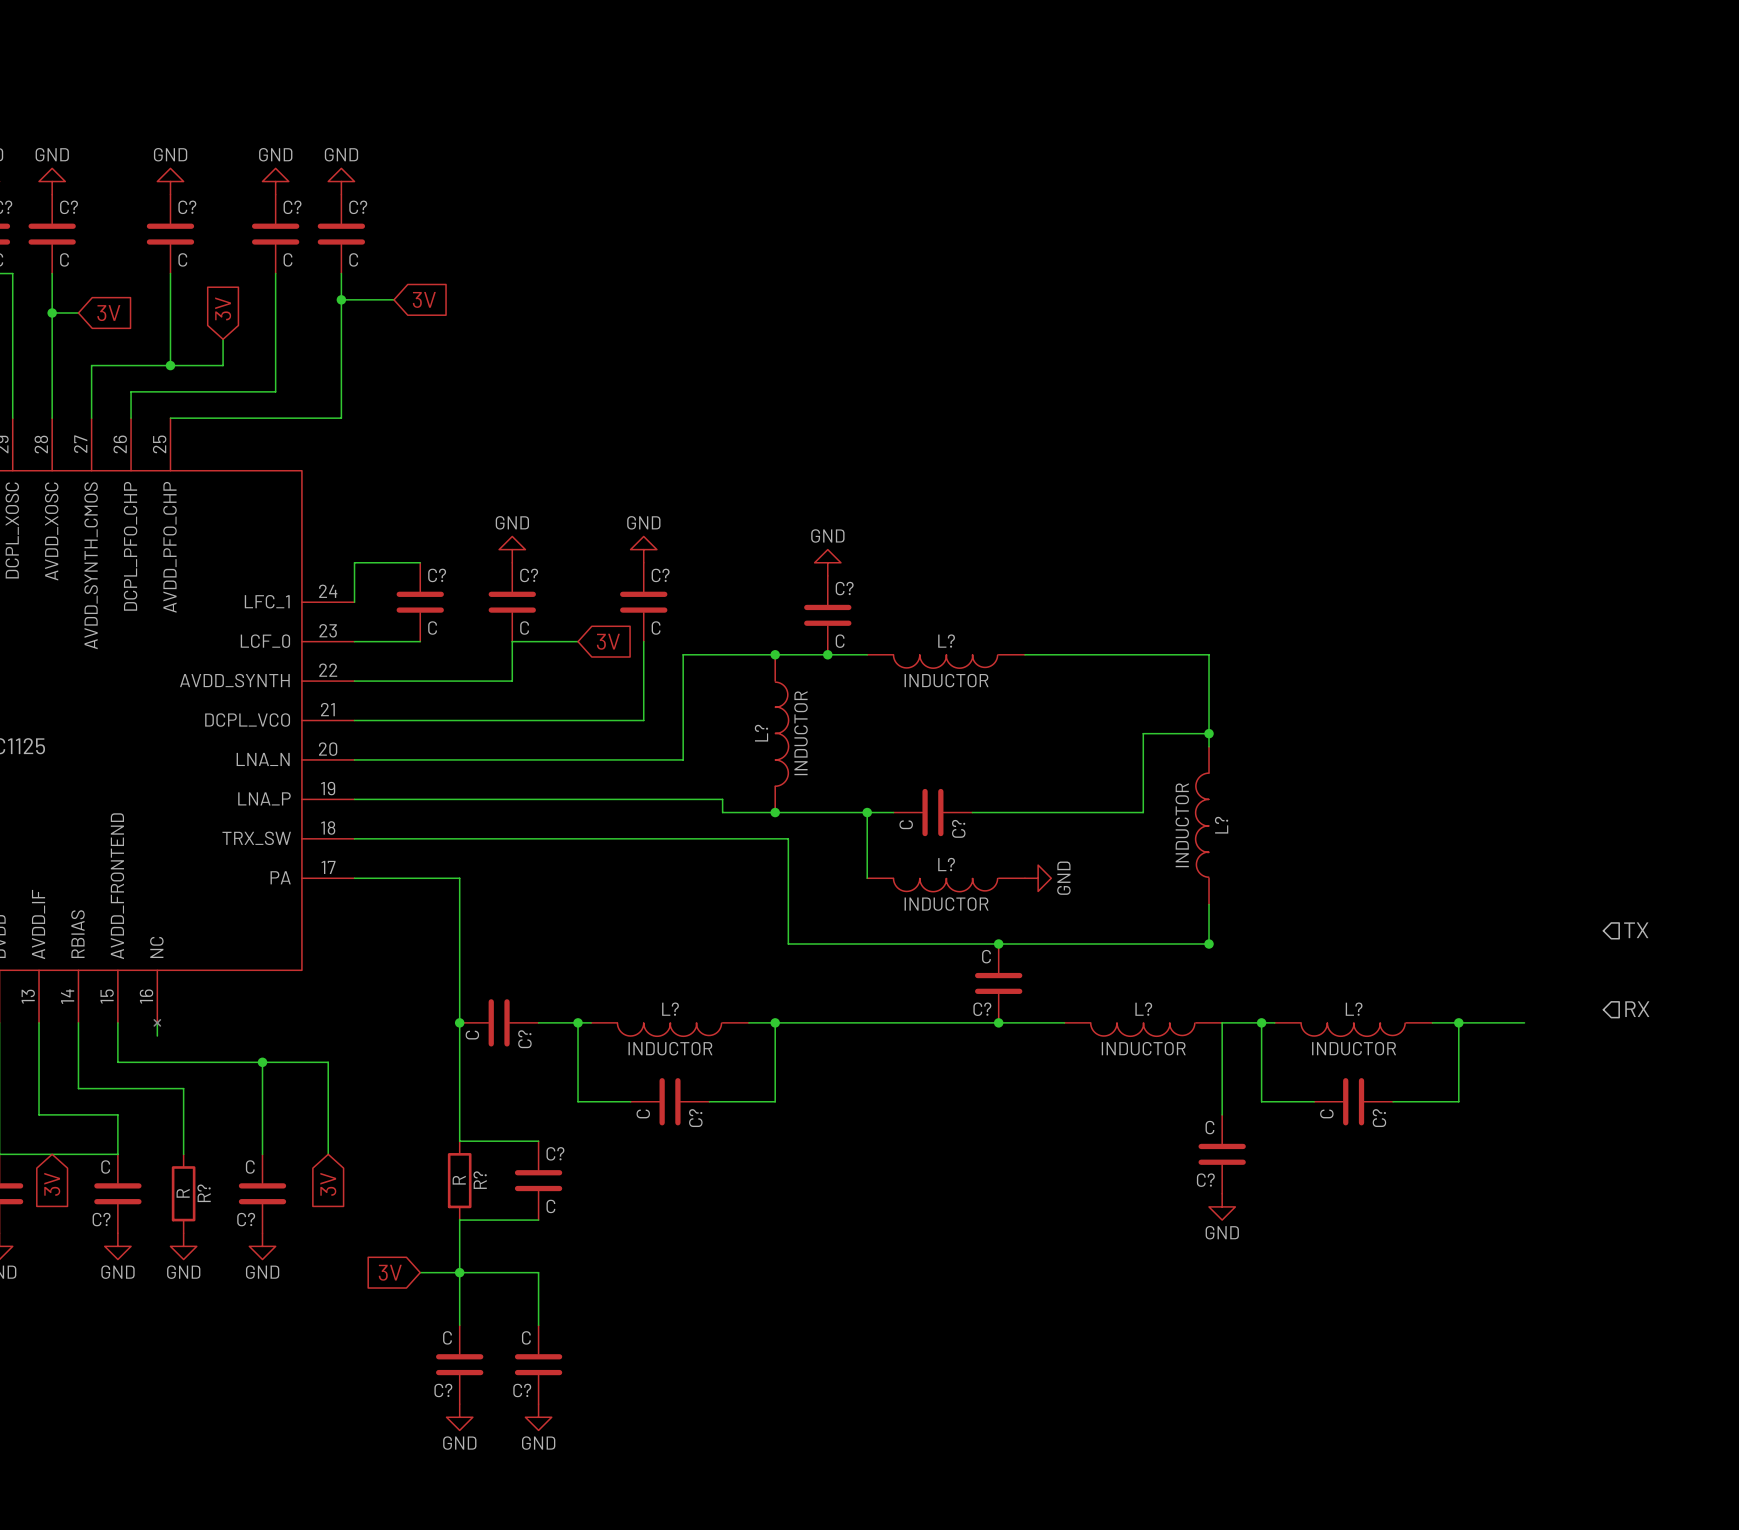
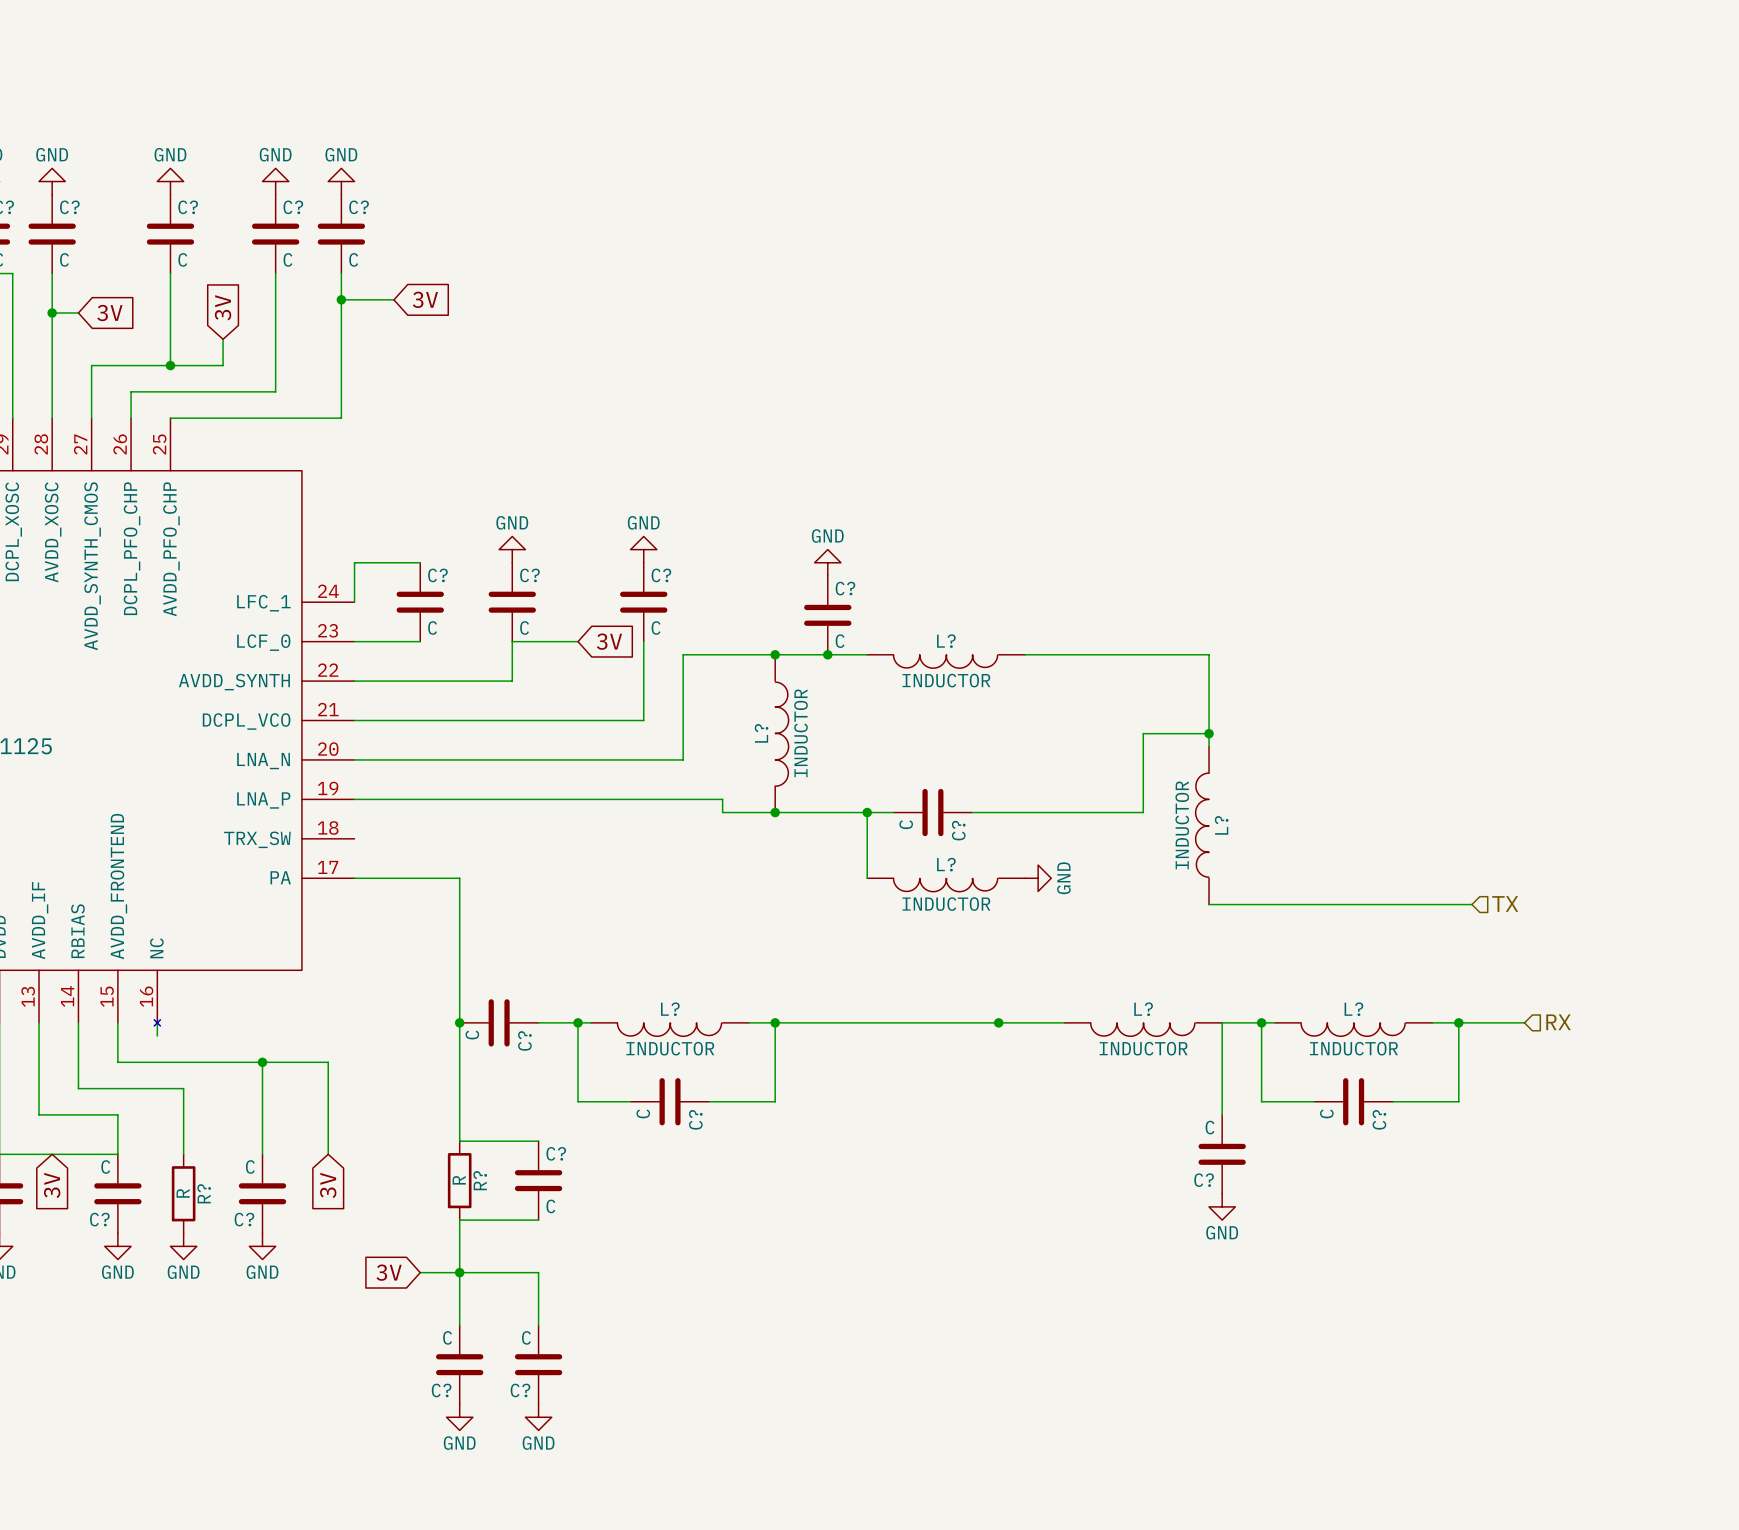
wire: (354, 838) (788, 838) (788, 944) (1209, 944) (1209, 904) -> (1471, 904) (1209, 904)
hierarchical label position: TX (1636, 930) -> TX (1505, 903)
junction: (998, 944) -> none
junction: (1209, 944) -> none
C?: C (998, 983) -> none
hierarchical label position: RX (1637, 1009) -> RX (1558, 1022)

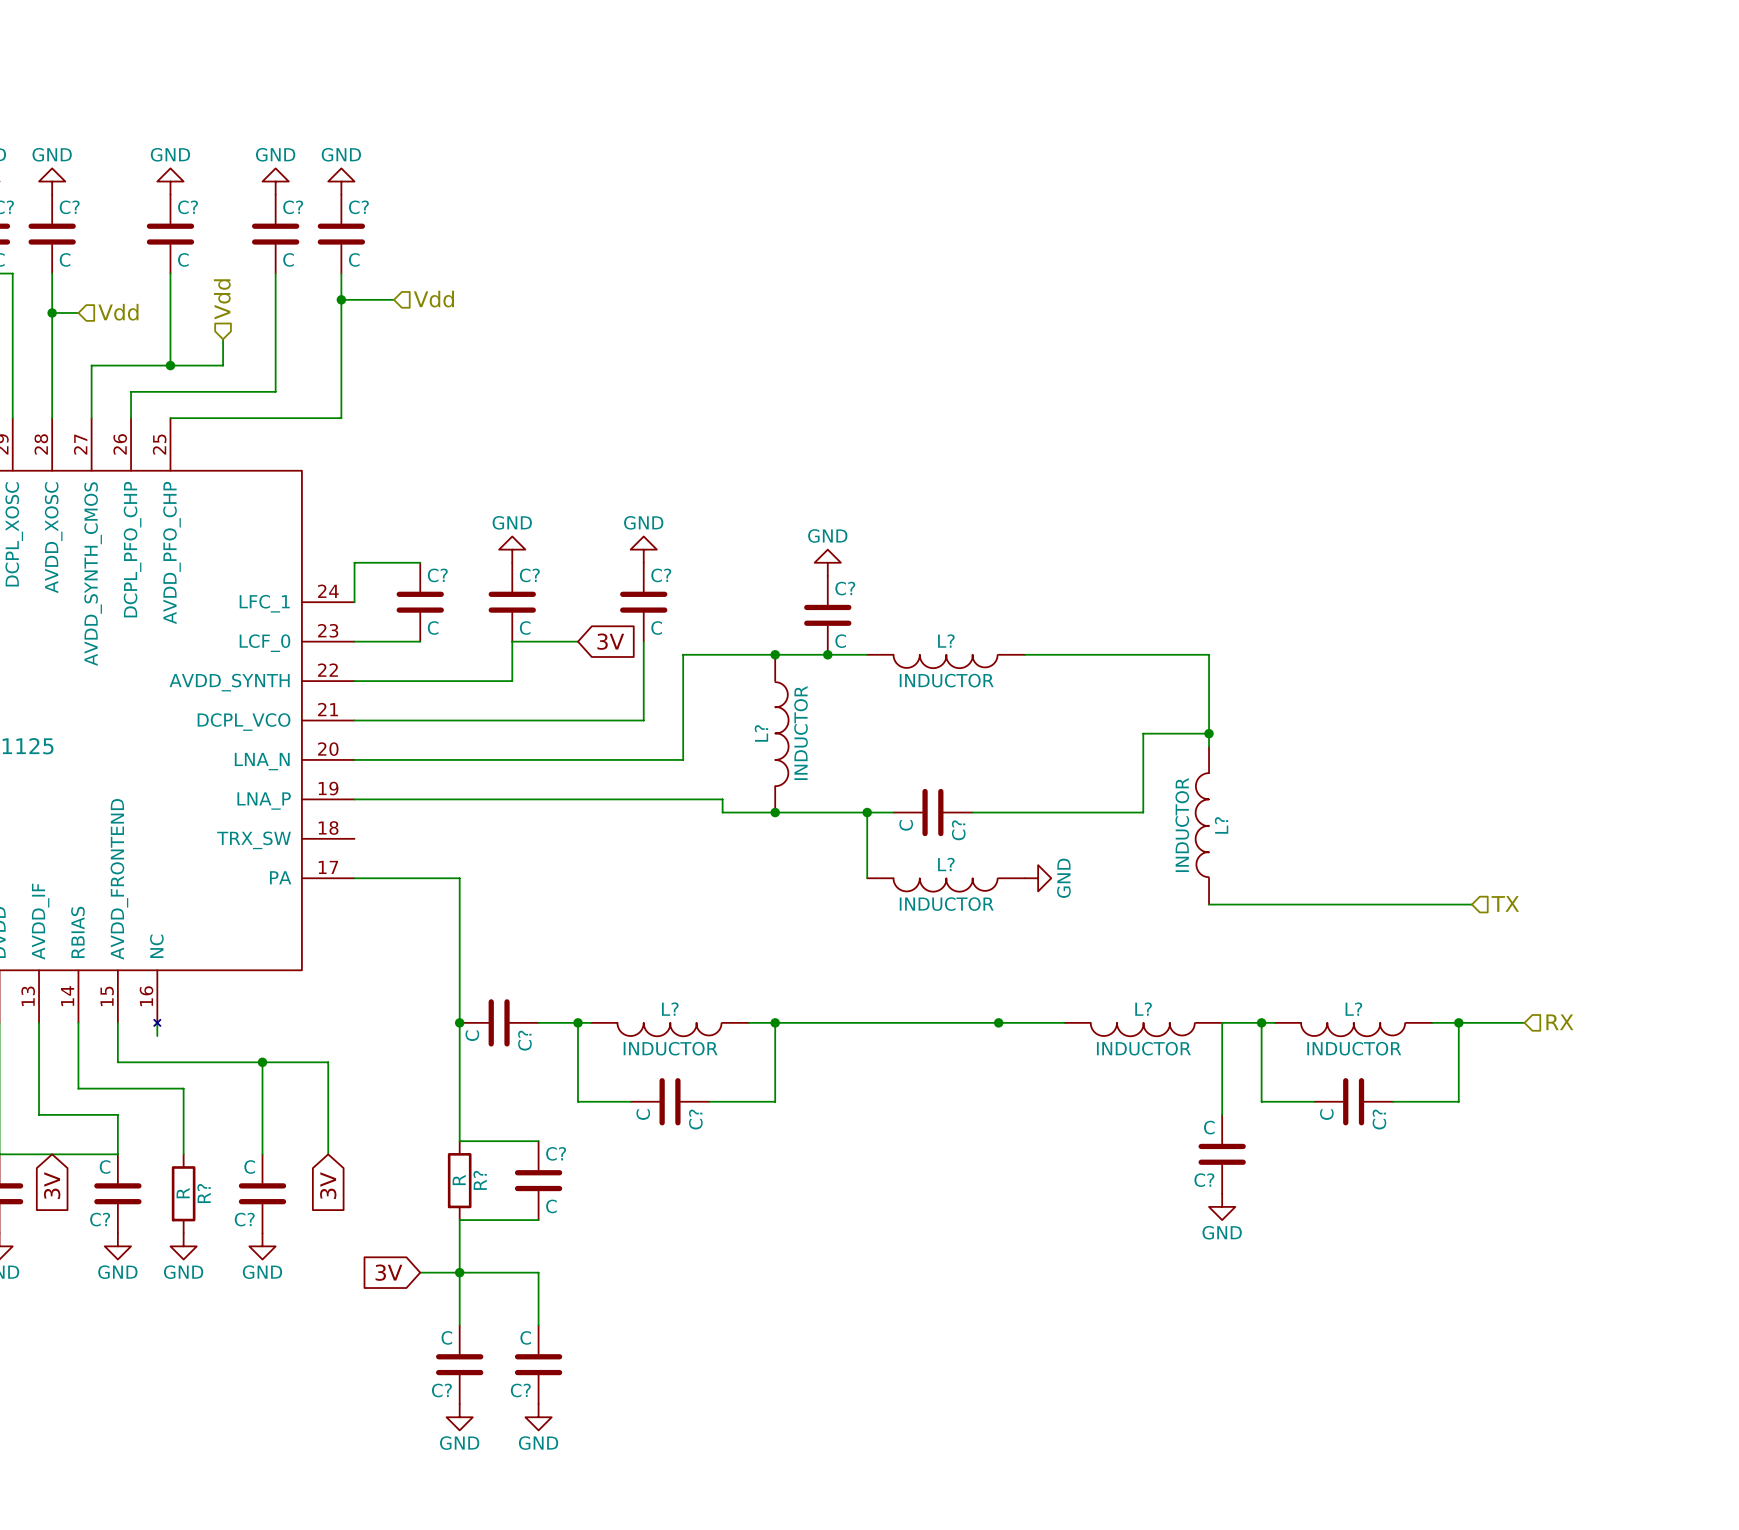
hierarchical label: none -> Vdd (433, 299)
hierarchical label: none -> Vdd (222, 299)
global label: 3V (425, 299) -> none
global label: 3V (223, 307) -> none
global label: 3V (109, 312) -> none
hierarchical label: none -> Vdd (118, 312)

